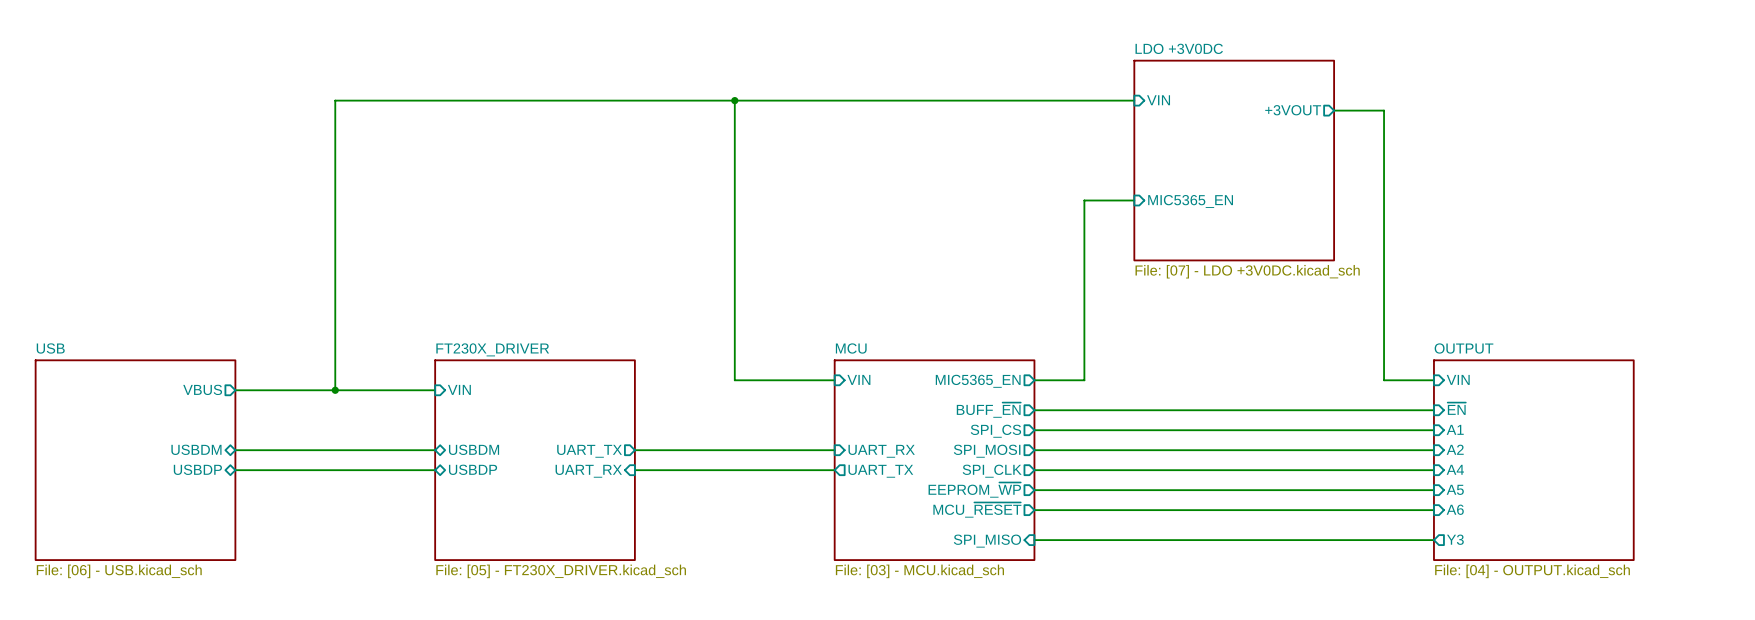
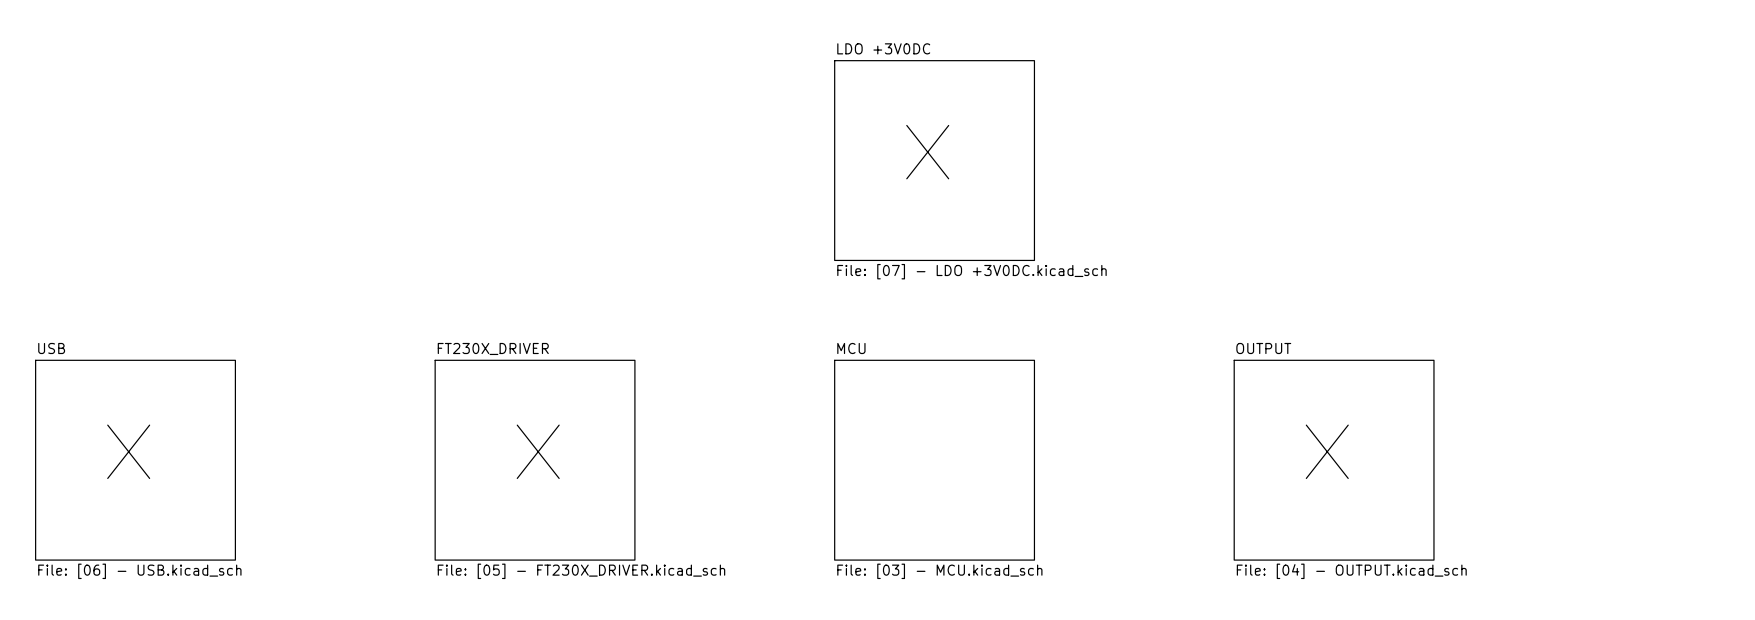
wire: (734, 100) (734, 380) (834, 380) -> none
junction: (734, 100) -> none
wire: (1134, 100) (335, 100) (335, 390) -> none
sheet pin: VIN (1158, 100) -> none
sheet pin: +3VOUT (1293, 110) -> none
wire: (1334, 110) (1384, 110) (1384, 380) (1433, 380) -> none
text: none -> x (927, 152)
sheet LDO +3V0DC position: (1234, 160) -> (934, 160)
wire: (1134, 200) (1084, 200) (1084, 380) (1034, 380) -> none
sheet pin: MIC5365_EN (1190, 201) -> none
sheet pin: VIN (858, 379) -> none
sheet pin: VIN (1458, 379) -> none
sheet pin: MIC5365_EN (978, 381) -> none
sheet pin: VBUS (202, 389) -> none
sheet pin: VIN (459, 389) -> none
wire: (235, 390) (435, 390) -> none
junction: (335, 390) -> none
sheet pin: ~{EN} (1456, 408) -> none
sheet pin: BUFF_~{EN} (988, 410) -> none
wire: (1034, 410) (1433, 410) -> none
sheet pin: A1 (1455, 429) -> none
wire: (1034, 430) (1433, 430) -> none
sheet pin: SPI_CS (995, 431) -> none
text: none -> x (128, 451)
text: none -> x (538, 451)
text: none -> x (1327, 451)
sheet pin: USBDM (196, 449) -> none
sheet pin: USBDM (474, 449) -> none
sheet pin: A2 (1455, 449) -> none
wire: (235, 450) (435, 450) -> none
wire: (634, 450) (834, 450) -> none
wire: (1034, 450) (1433, 450) -> none
sheet pin: UART_TX (589, 451) -> none
sheet pin: UART_RX (881, 451) -> none
sheet pin: SPI_MOSI (987, 451) -> none
sheet OUTPUT: none -> File: [04] - OUTPUT.kicad_sch (1334, 460)
sheet OUTPUT: File: [04] - OUTPUT.kicad_sch (1533, 460) -> none
sheet pin: USBDP (197, 469) -> none
sheet pin: USBDP (473, 469) -> none
sheet pin: A4 (1455, 469) -> none
wire: (235, 470) (435, 470) -> none
wire: (634, 470) (834, 470) -> none
wire: (1034, 470) (1433, 470) -> none
sheet pin: UART_RX (588, 471) -> none
sheet pin: UART_TX (880, 471) -> none
sheet pin: SPI_CLK (992, 471) -> none
sheet pin: A5 (1455, 489) -> none
sheet pin: EEPROM_~{WP} (974, 490) -> none
wire: (1034, 490) (1433, 490) -> none
sheet pin: A6 (1455, 509) -> none
sheet pin: MCU_~{RESET} (977, 510) -> none
wire: (1034, 510) (1433, 510) -> none
sheet pin: Y3 (1455, 539) -> none
wire: (1034, 540) (1433, 540) -> none
sheet pin: SPI_MISO (987, 541) -> none

